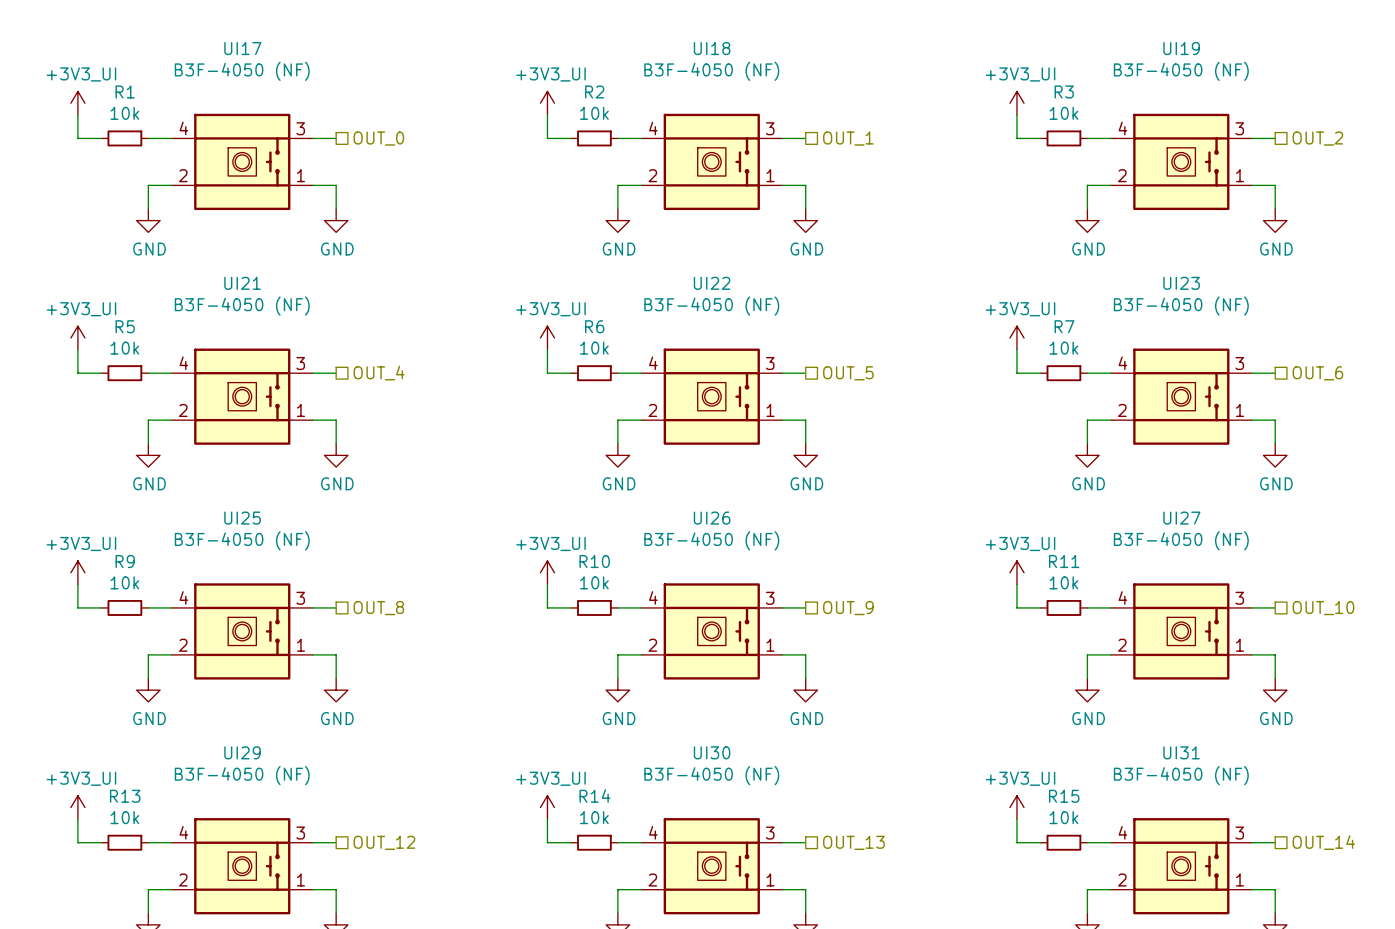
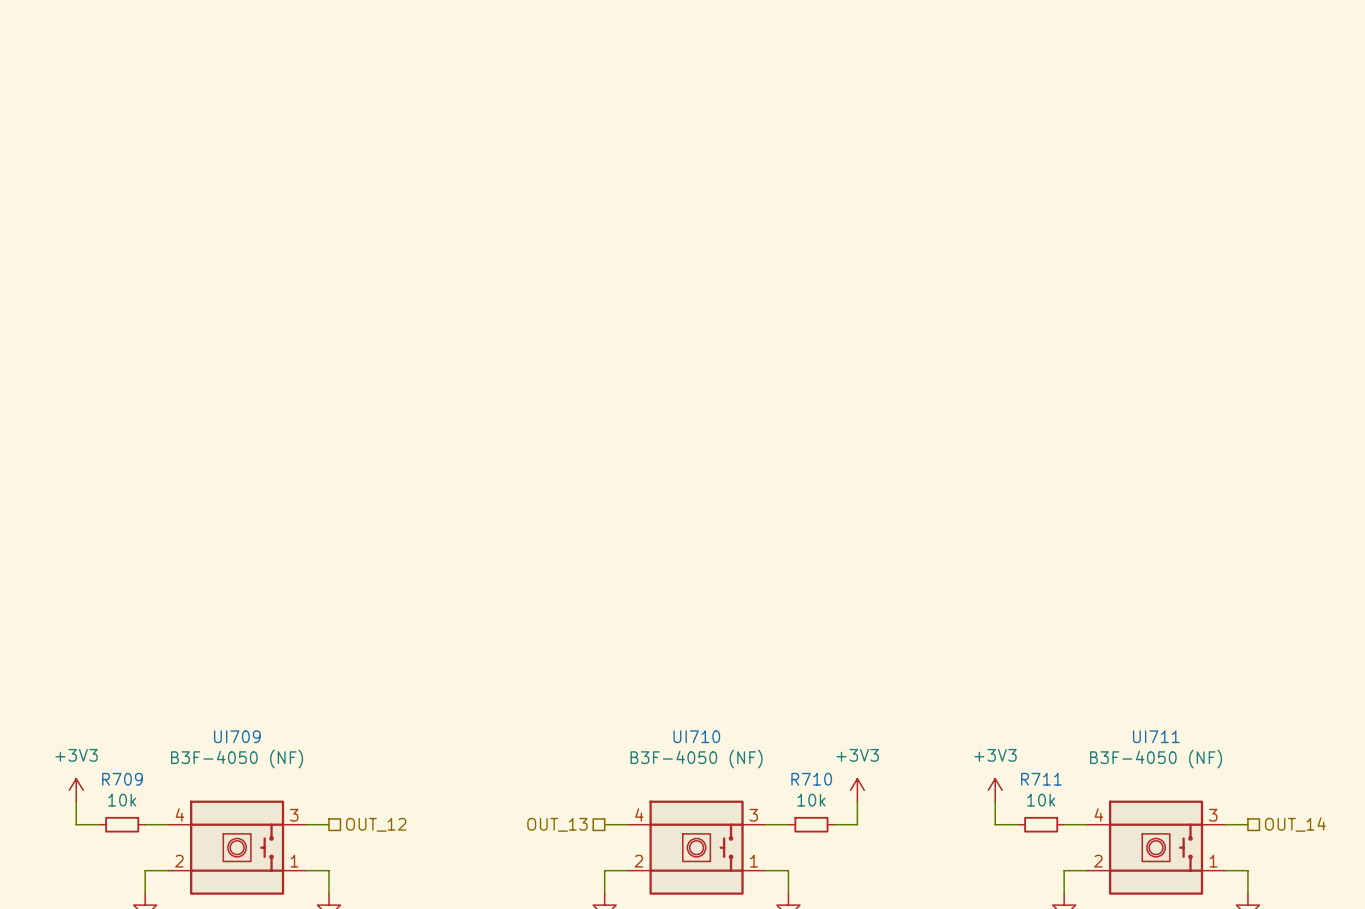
power symbol: +3V3_UI (77, 103) -> none
power symbol: +3V3_UI (547, 103) -> none
power symbol: +3V3_UI (1016, 103) -> none
wire: (77, 114) (77, 138) (101, 138) -> none
wire: (547, 114) (547, 138) (570, 138) -> none
wire: (1016, 114) (1016, 138) (1040, 138) -> none
R1: 10k (124, 138) -> none
wire: (148, 138) (171, 138) -> none
wire: (312, 138) (336, 138) -> none
hierarchical label: OUT_0 (378, 138) -> none
R2: 10k (594, 138) -> none
wire: (617, 138) (641, 138) -> none
wire: (782, 138) (805, 138) -> none
hierarchical label: OUT_1 (848, 138) -> none
R3: 10k (1063, 138) -> none
wire: (1087, 138) (1110, 138) -> none
wire: (1251, 138) (1275, 138) -> none
hierarchical label: OUT_2 (1317, 138) -> none
UI17: B3F-4050 (NF) (242, 161) -> none
UI18: B3F-4050 (NF) (711, 161) -> none
UI19: B3F-4050 (NF) (1181, 161) -> none
wire: (171, 185) (148, 185) (148, 208) -> none
wire: (312, 185) (336, 185) (336, 208) -> none
wire: (641, 185) (617, 185) (617, 208) -> none
wire: (782, 185) (805, 185) (805, 208) -> none
wire: (1110, 185) (1087, 185) (1087, 208) -> none
wire: (1251, 185) (1275, 185) (1275, 208) -> none
power symbol: GND (148, 220) -> none
power symbol: GND (336, 220) -> none
power symbol: GND (617, 220) -> none
power symbol: GND (805, 220) -> none
power symbol: GND (1087, 220) -> none
power symbol: GND (1275, 220) -> none
power symbol: +3V3_UI (77, 337) -> none
power symbol: +3V3_UI (547, 337) -> none
power symbol: +3V3_UI (1016, 337) -> none
wire: (77, 349) (77, 373) (101, 373) -> none
wire: (547, 349) (547, 373) (570, 373) -> none
wire: (1016, 349) (1016, 373) (1040, 373) -> none
R5: 10k (124, 373) -> none
wire: (148, 373) (171, 373) -> none
wire: (312, 373) (336, 373) -> none
hierarchical label: OUT_4 (379, 373) -> none
R6: 10k (594, 373) -> none
wire: (617, 373) (641, 373) -> none
wire: (782, 373) (805, 373) -> none
hierarchical label: OUT_5 (848, 373) -> none
R7: 10k (1063, 373) -> none
wire: (1087, 373) (1110, 373) -> none
wire: (1251, 373) (1275, 373) -> none
hierarchical label: OUT_6 (1317, 373) -> none
UI21: B3F-4050 (NF) (242, 396) -> none
UI22: B3F-4050 (NF) (711, 396) -> none
UI23: B3F-4050 (NF) (1181, 396) -> none
wire: (171, 420) (148, 420) (148, 443) -> none
wire: (312, 420) (336, 420) (336, 443) -> none
wire: (641, 420) (617, 420) (617, 443) -> none
wire: (782, 420) (805, 420) (805, 443) -> none
wire: (1110, 420) (1087, 420) (1087, 443) -> none
wire: (1251, 420) (1275, 420) (1275, 443) -> none
power symbol: GND (148, 455) -> none
power symbol: GND (336, 455) -> none
power symbol: GND (617, 455) -> none
power symbol: GND (805, 455) -> none
power symbol: GND (1087, 455) -> none
power symbol: GND (1275, 455) -> none
power symbol: +3V3_UI (77, 572) -> none
power symbol: +3V3_UI (547, 572) -> none
power symbol: +3V3_UI (1016, 572) -> none
wire: (77, 584) (77, 607) (101, 607) -> none
wire: (547, 584) (547, 607) (570, 607) -> none
wire: (1016, 584) (1016, 607) (1040, 607) -> none
R9: 10k (124, 607) -> none
wire: (148, 607) (171, 607) -> none
wire: (312, 607) (336, 607) -> none
R10: 10k (594, 607) -> none
wire: (617, 607) (641, 607) -> none
wire: (782, 607) (805, 607) -> none
R11: 10k (1063, 607) -> none
wire: (1087, 607) (1110, 607) -> none
wire: (1251, 607) (1275, 607) -> none
hierarchical label: OUT_8 (378, 608) -> none
hierarchical label: OUT_9 (848, 608) -> none
hierarchical label: OUT_10 (1323, 608) -> none
UI25: B3F-4050 (NF) (242, 631) -> none
UI26: B3F-4050 (NF) (711, 631) -> none
UI27: B3F-4050 (NF) (1181, 631) -> none
wire: (171, 654) (148, 654) (148, 678) -> none
wire: (312, 654) (336, 654) (336, 678) -> none
wire: (641, 654) (617, 654) (617, 678) -> none
wire: (782, 654) (805, 654) (805, 678) -> none
wire: (1110, 654) (1087, 654) (1087, 678) -> none
wire: (1251, 654) (1275, 654) (1275, 678) -> none
power symbol: GND (148, 690) -> none
power symbol: GND (336, 690) -> none
power symbol: GND (617, 690) -> none
power symbol: GND (805, 690) -> none
power symbol: GND (1087, 690) -> none
power symbol: GND (1275, 690) -> none
UI29 name: UI29 (242, 752) -> UI709 (237, 736)
UI30 name: UI30 (712, 752) -> UI710 (696, 736)
UI31 name: UI31 (1181, 752) -> UI711 (1156, 736)
R13 name: R13 (125, 796) -> R709 (122, 779)
R15 name: R15 (1064, 796) -> R711 (1041, 779)
power symbol: +3V3_UI (77, 807) -> +3V3 (76, 790)
power symbol: +3V3_UI (547, 807) -> none
power symbol: none -> +3V3 (857, 790)
power symbol: +3V3_UI (1016, 807) -> +3V3 (995, 790)
wire: (547, 819) (547, 842) (570, 842) -> none
wire: none -> (857, 801) (857, 824) (834, 824)
R14: 10k (594, 842) -> none
R710: none -> 10k (811, 824)
hierarchical label rotation: 0° (853, 842) -> 180° (557, 824)
hierarchical label position: OUT_13 (853, 842) -> OUT_13 (557, 824)

